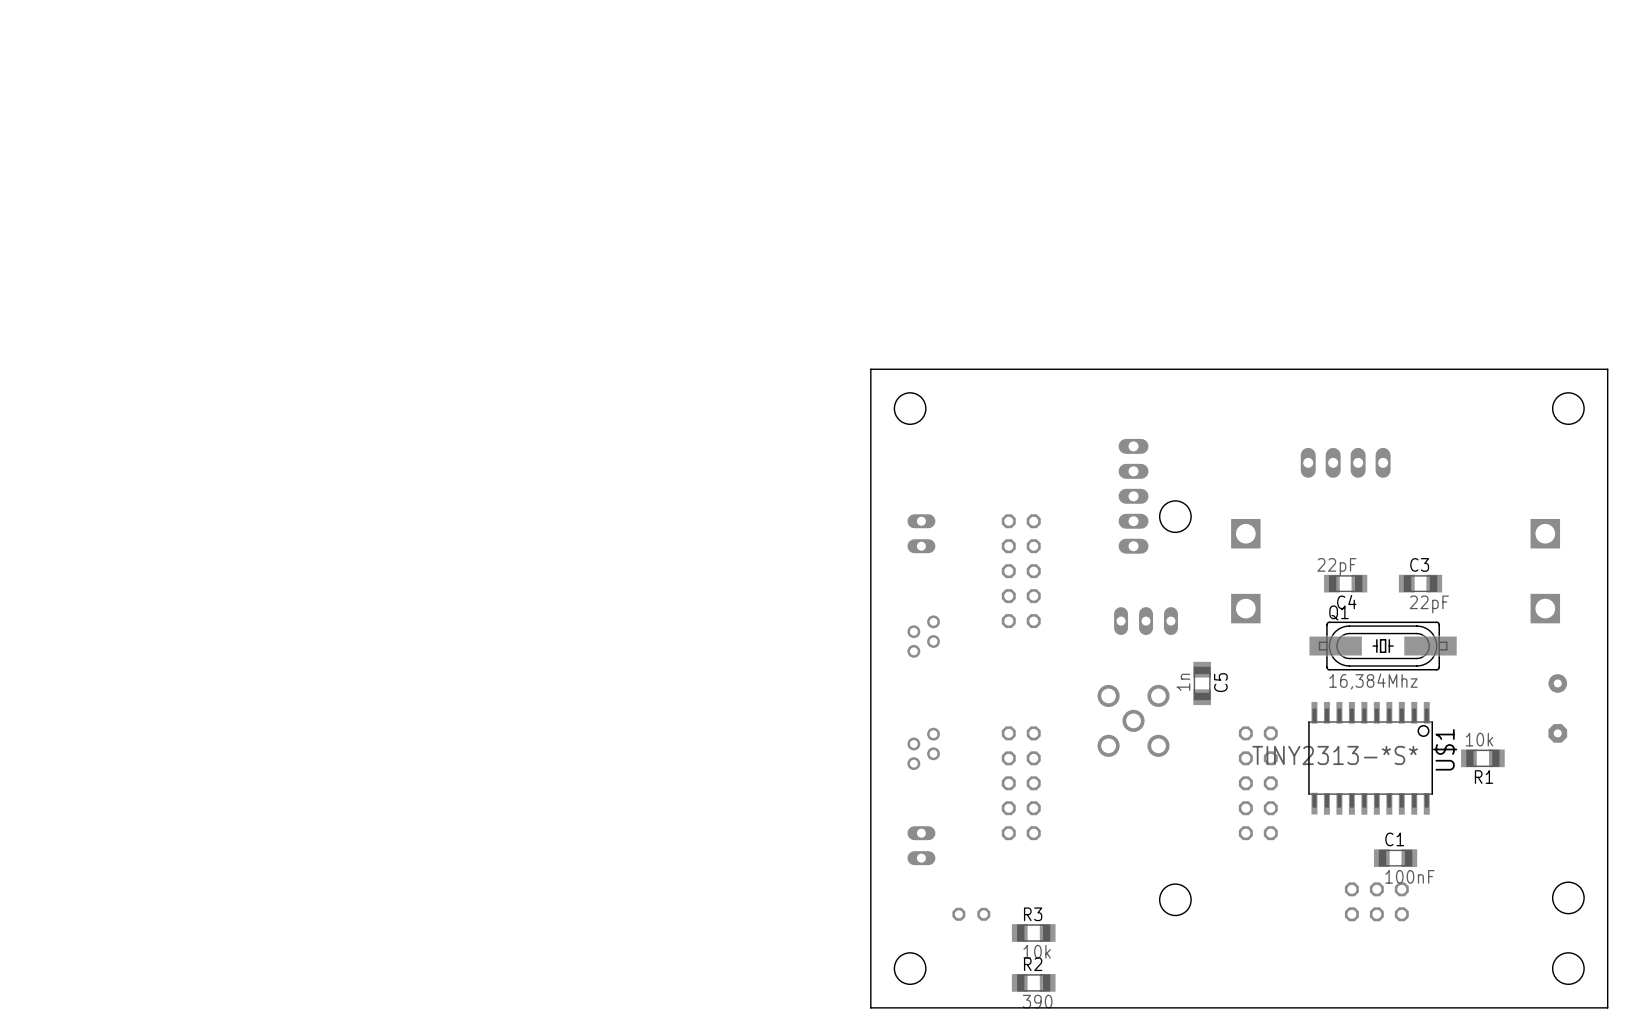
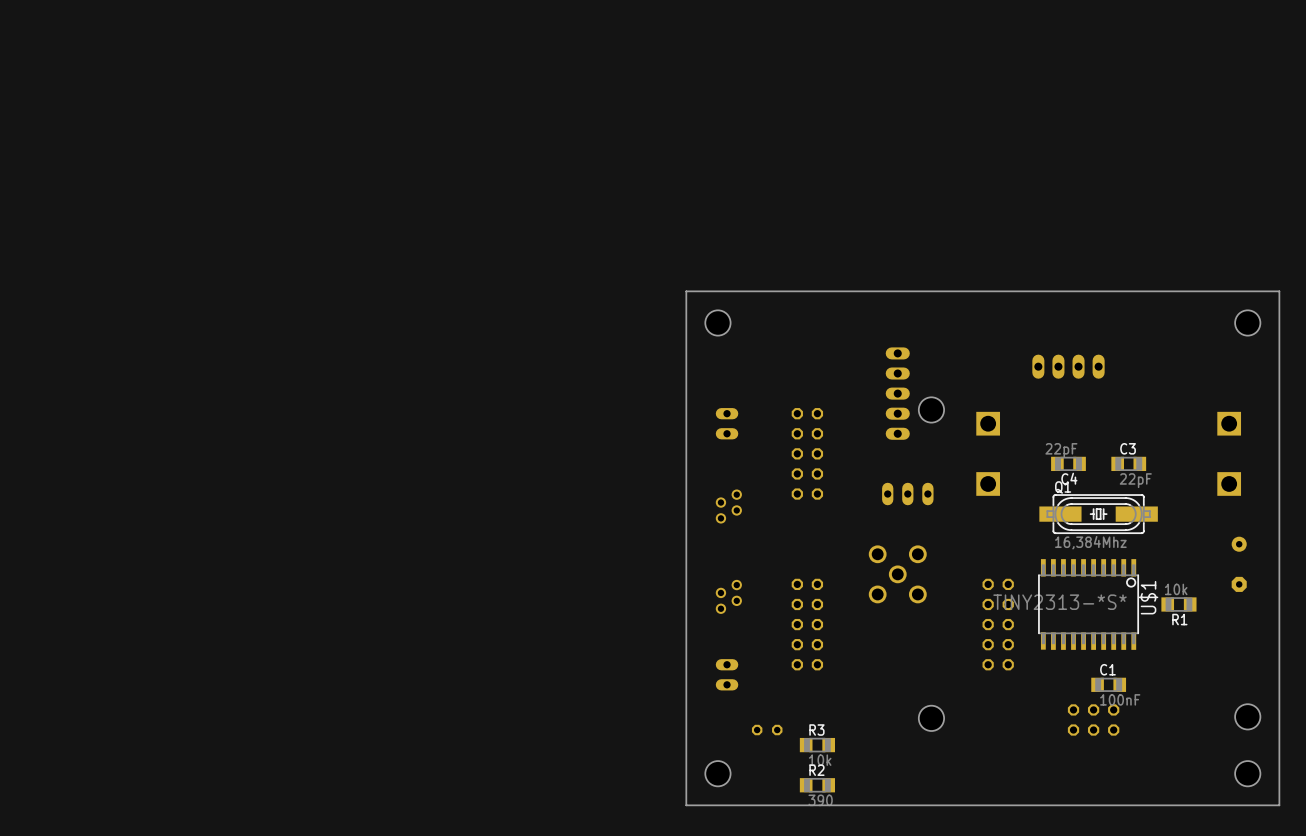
C5: 1n (1202, 683) -> none

